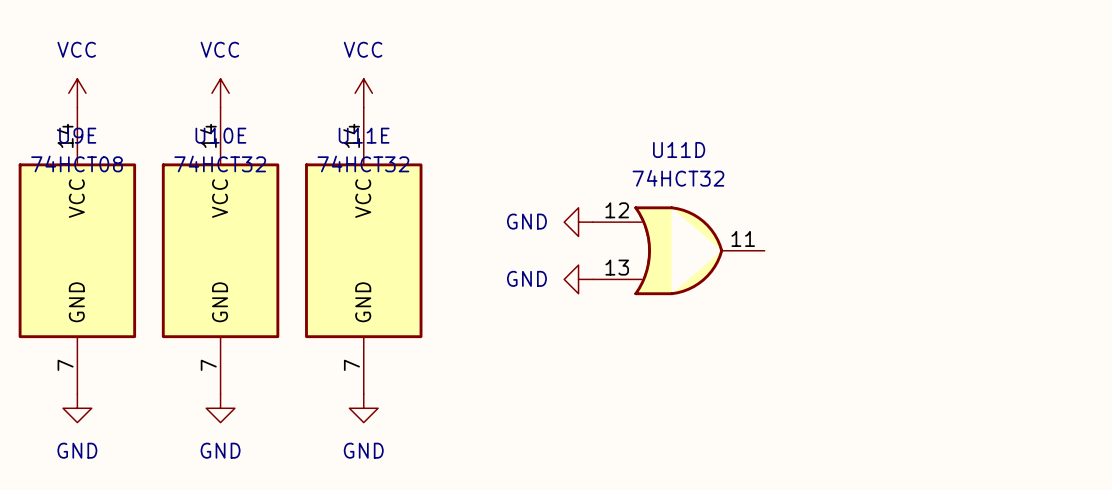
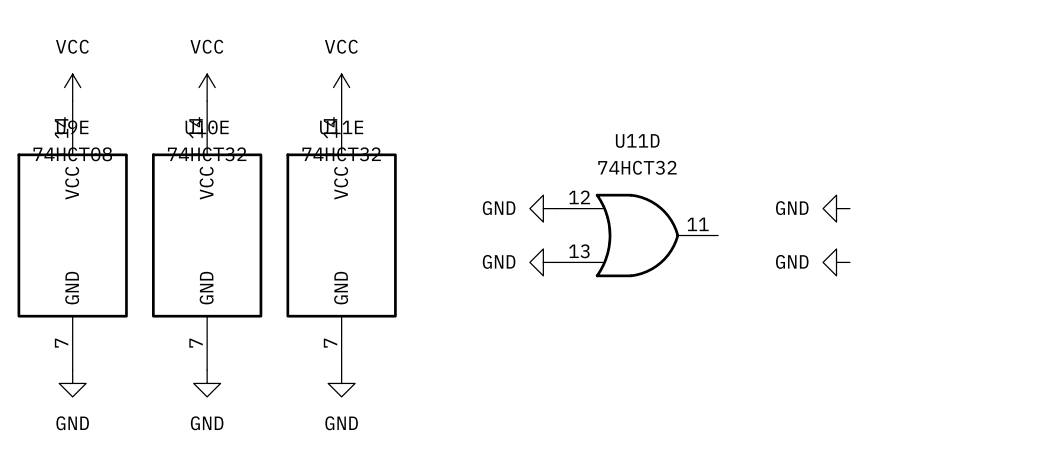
power symbol: none -> GND (836, 208)
power symbol: none -> GND (836, 262)

